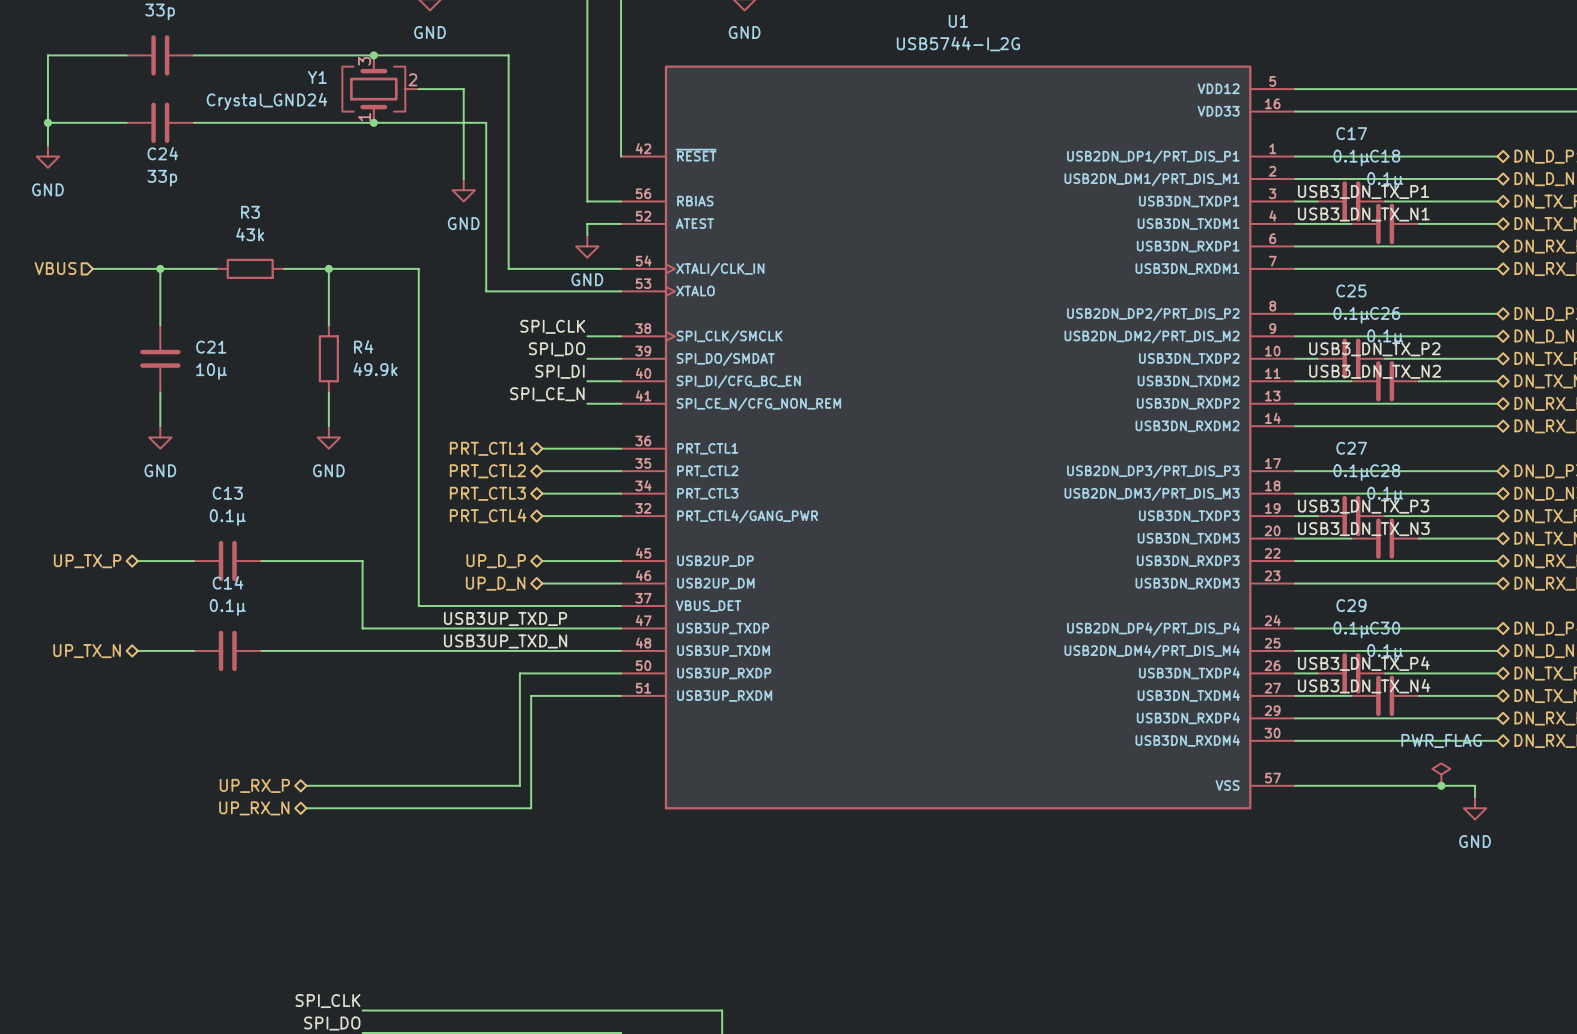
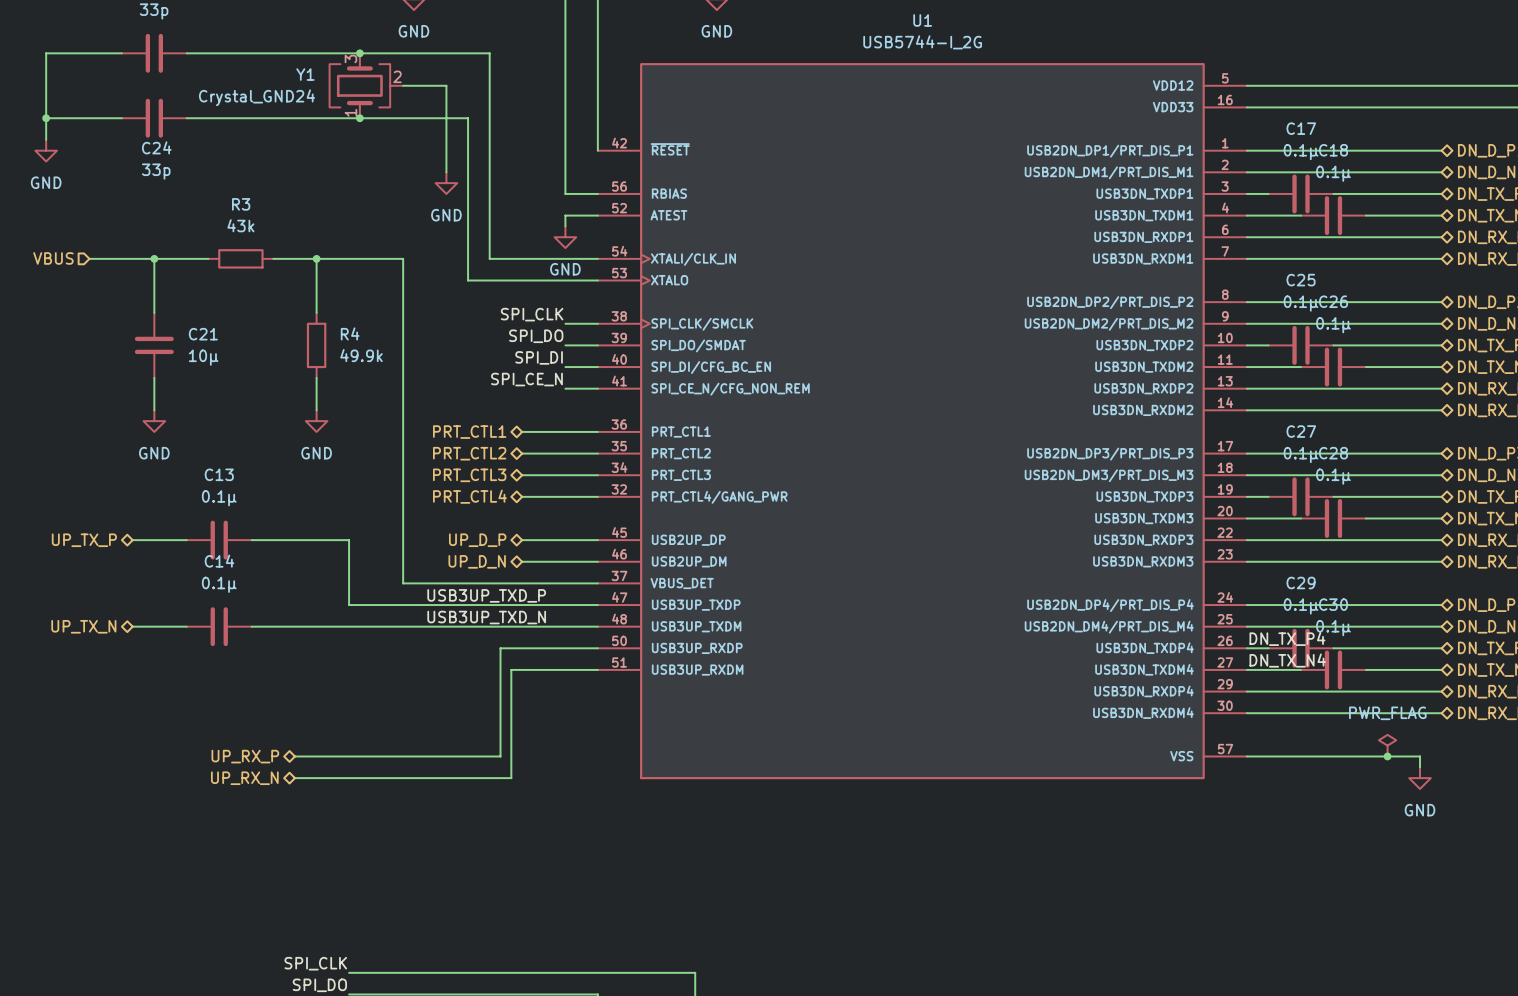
label: USB3_DN_TX_P1 (1363, 191) -> none
label: USB3_DN_TX_N1 (1363, 214) -> none
label: USB3_DN_TX_P2 (1374, 349) -> none
label: USB3_DN_TX_N2 (1375, 371) -> none
label: USB3_DN_TX_P3 (1363, 506) -> none
label: USB3_DN_TX_N3 (1363, 529) -> none
label: USB3_DN_TX_P4 (1363, 663) -> DN_TX_P4 (1287, 638)
label: USB3_DN_TX_N4 (1364, 686) -> DN_TX_N4 (1287, 660)

